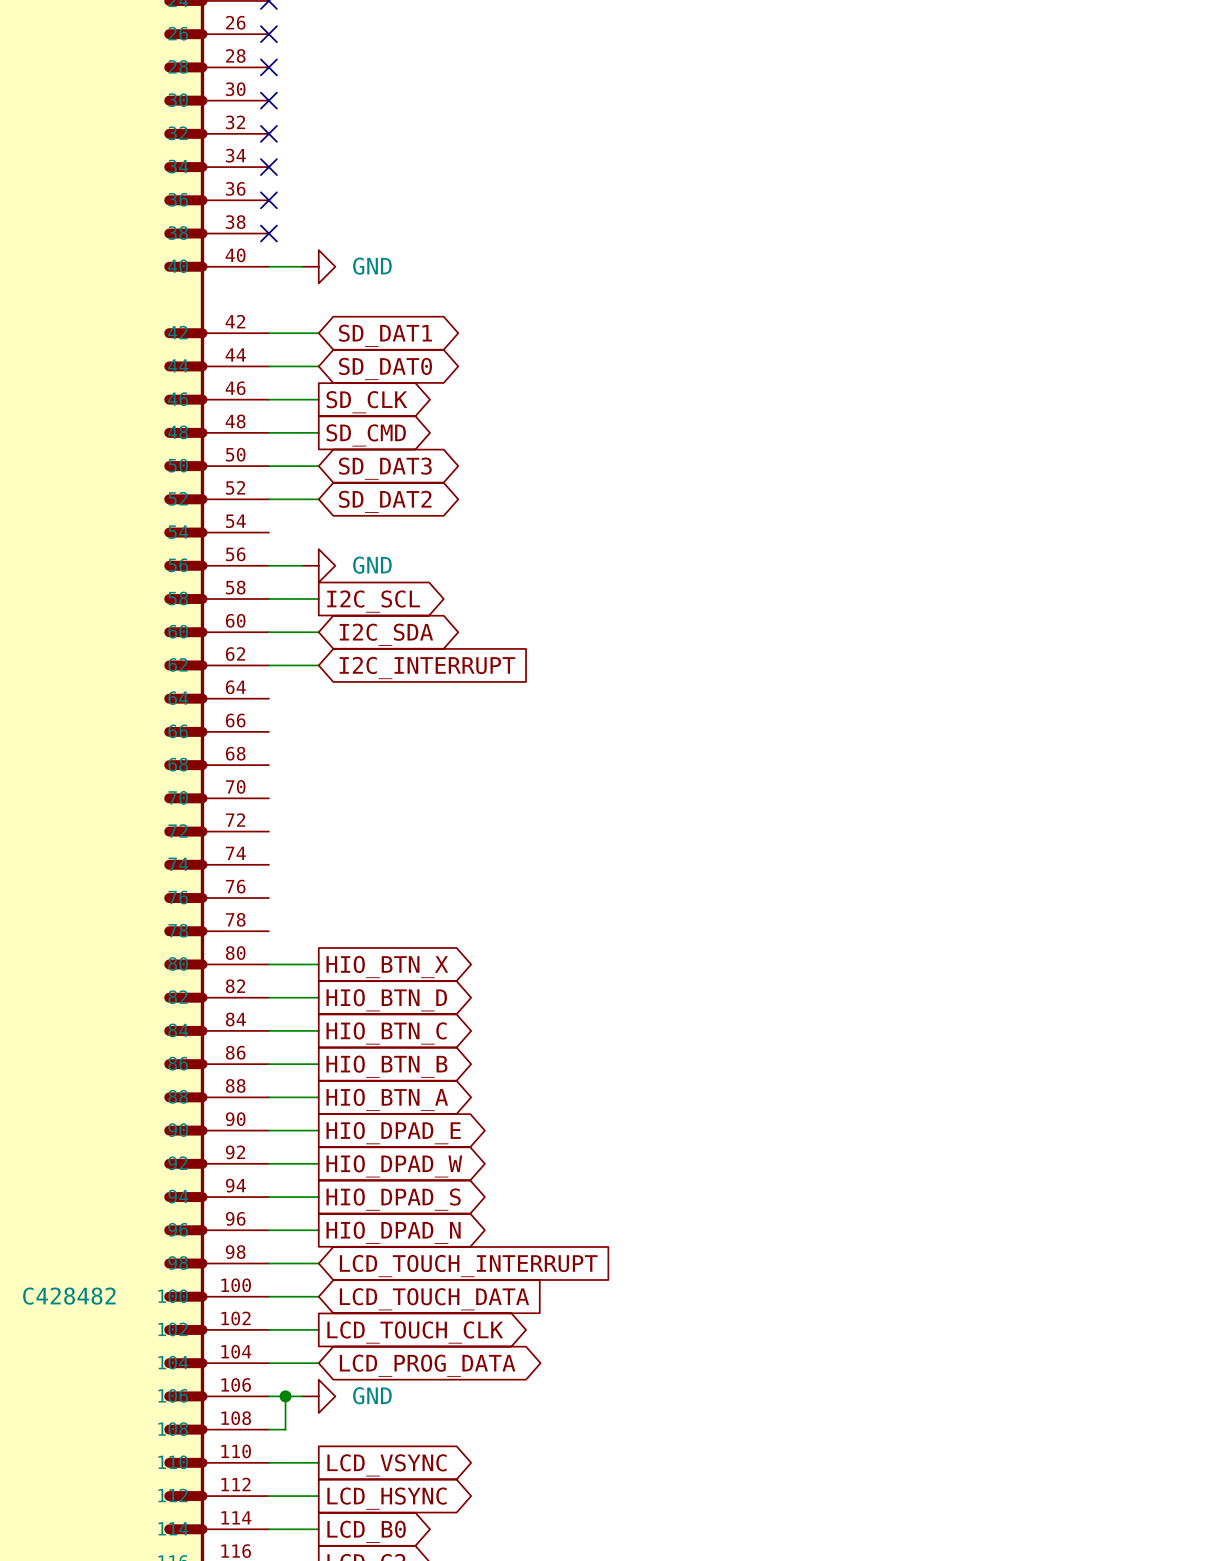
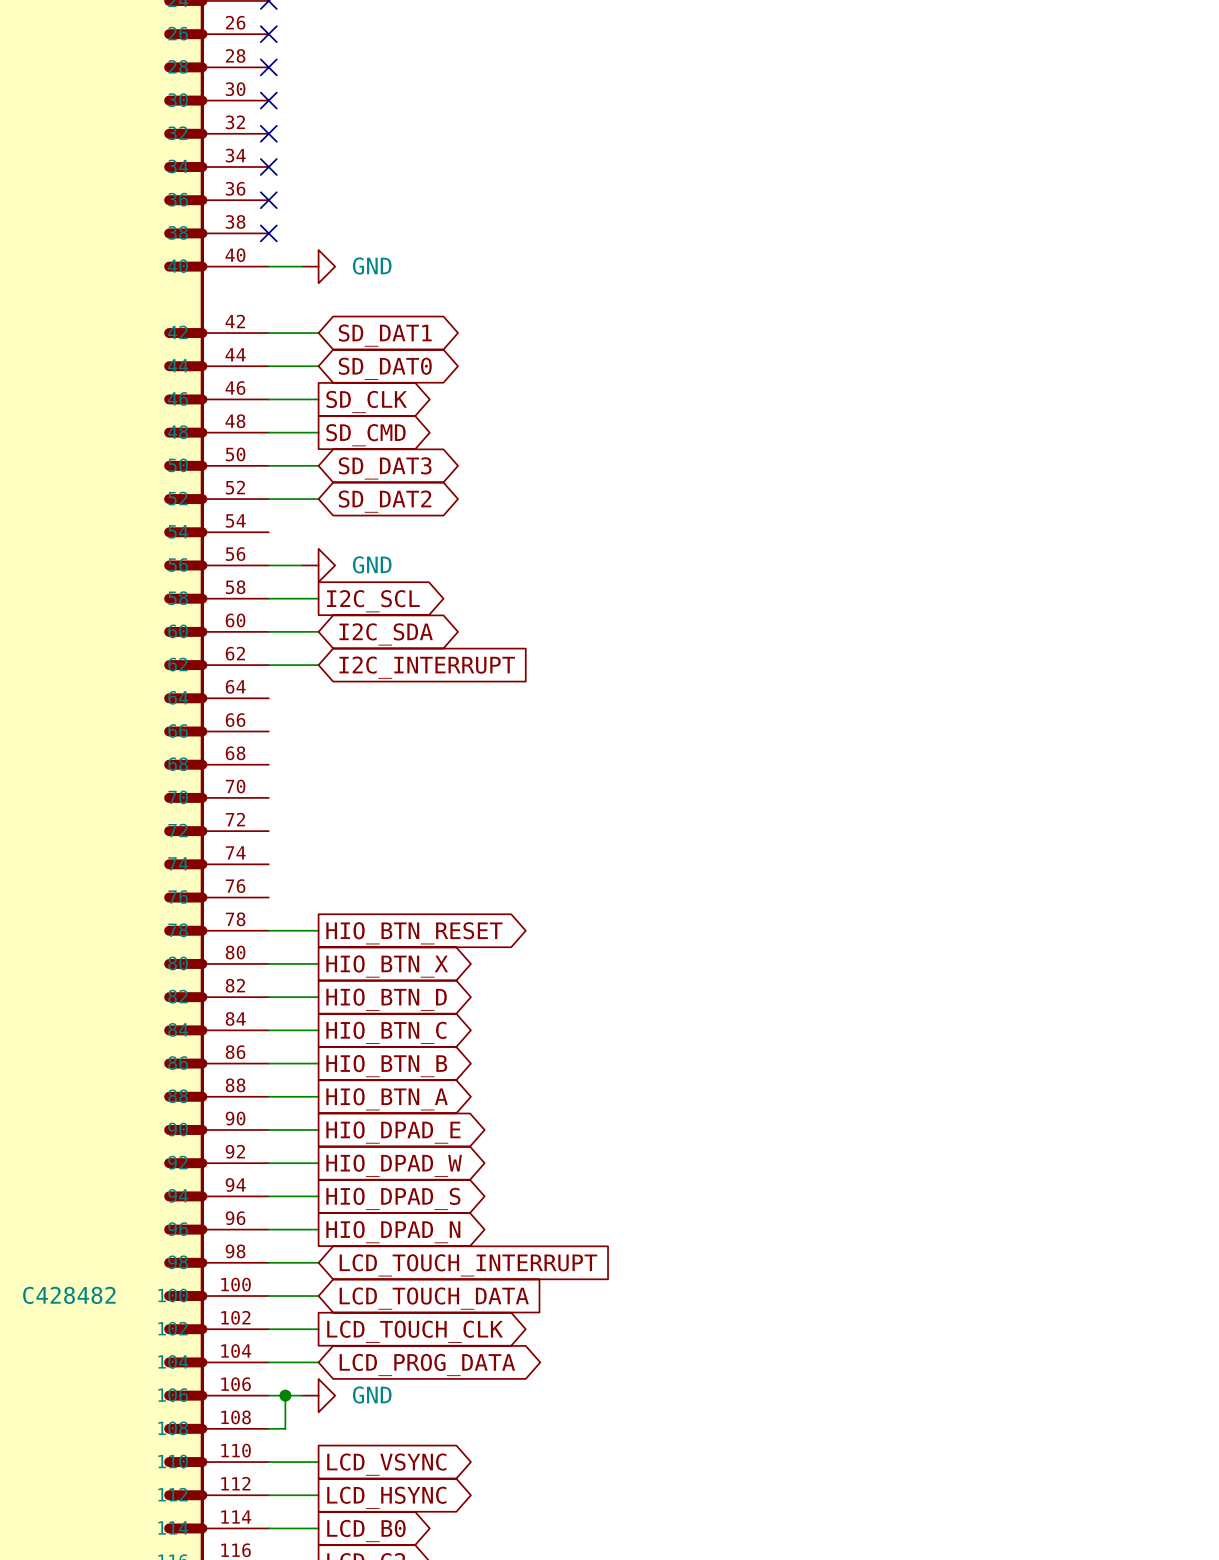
wire: none -> (268, 930) (318, 930)
global label: none -> HIO_BTN_RESET (414, 933)

